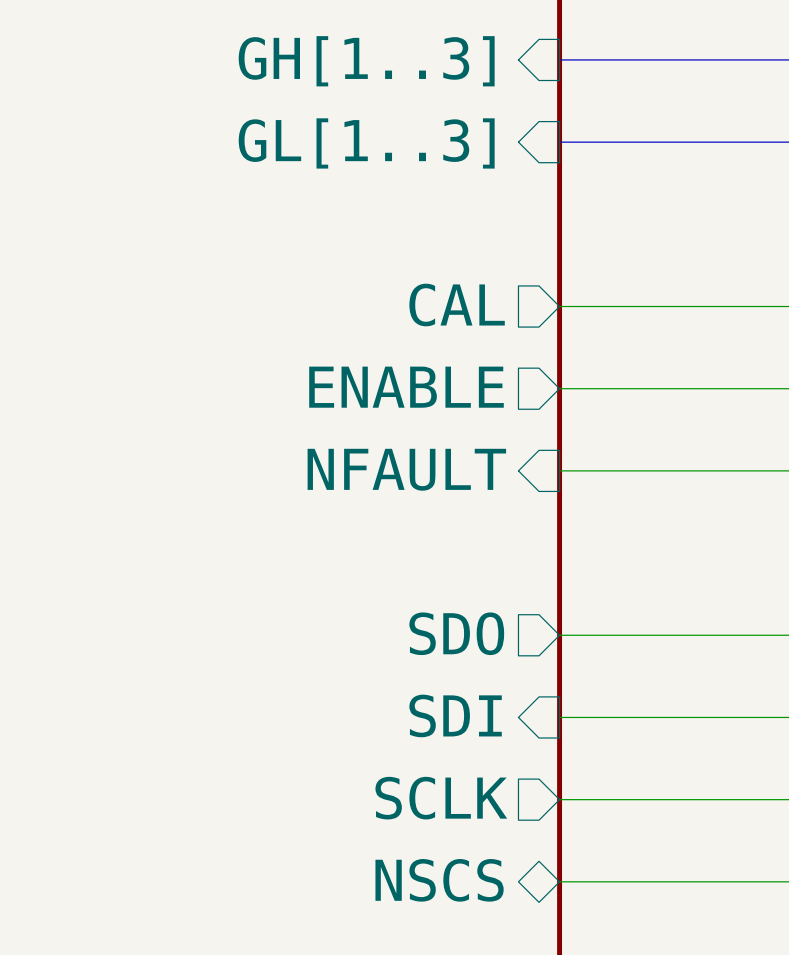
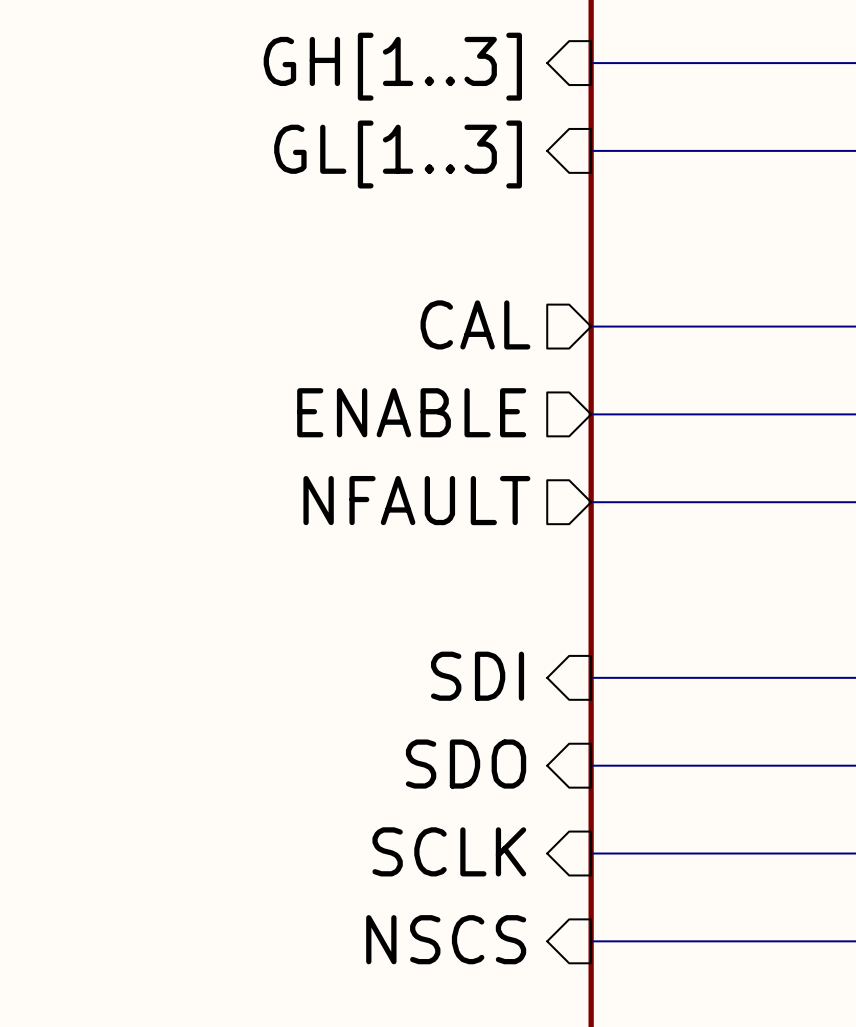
sheet pin shape: input (406, 469) -> output (416, 500)
sheet pin shape: output (456, 633) -> input (477, 676)
sheet pin: SDO (456, 633) -> SDI (477, 676)
sheet pin: SDI (455, 715) -> SDO (466, 764)
sheet pin shape: output (441, 798) -> input (449, 851)
sheet pin shape: bidirectional (439, 880) -> input (446, 939)

